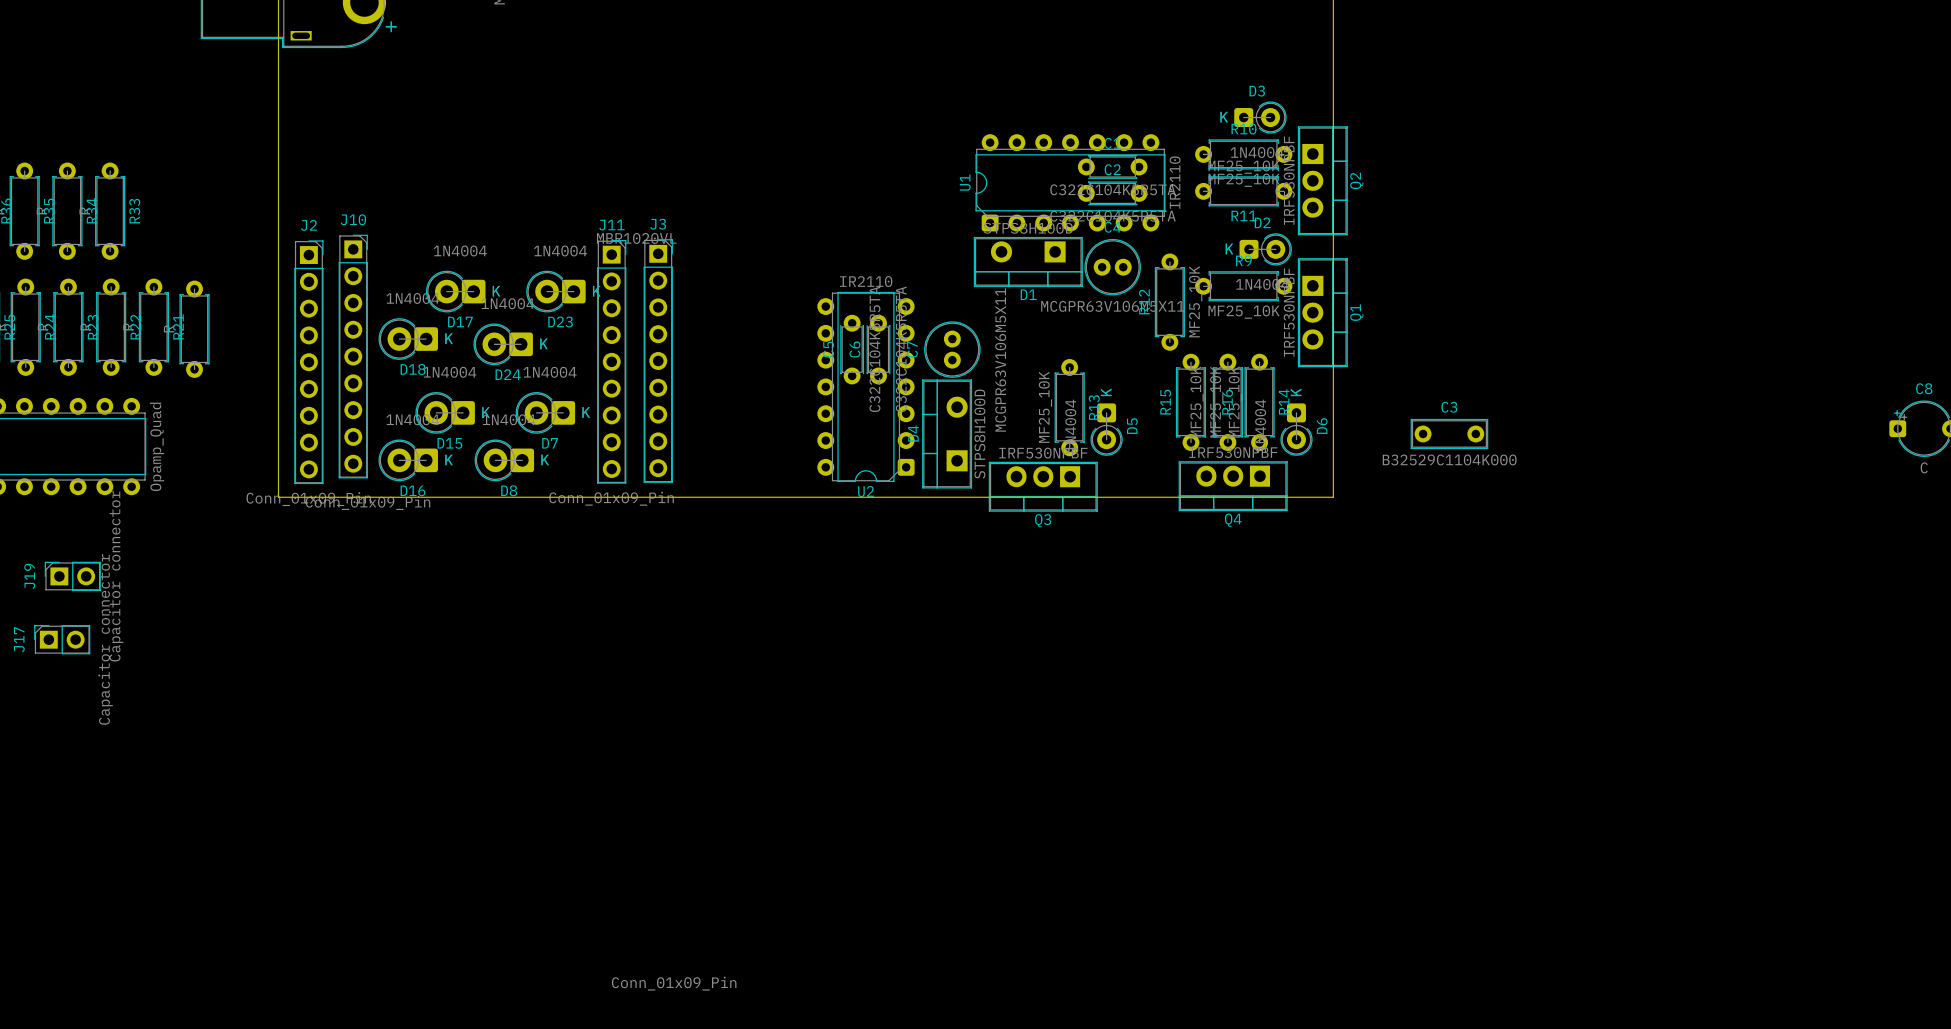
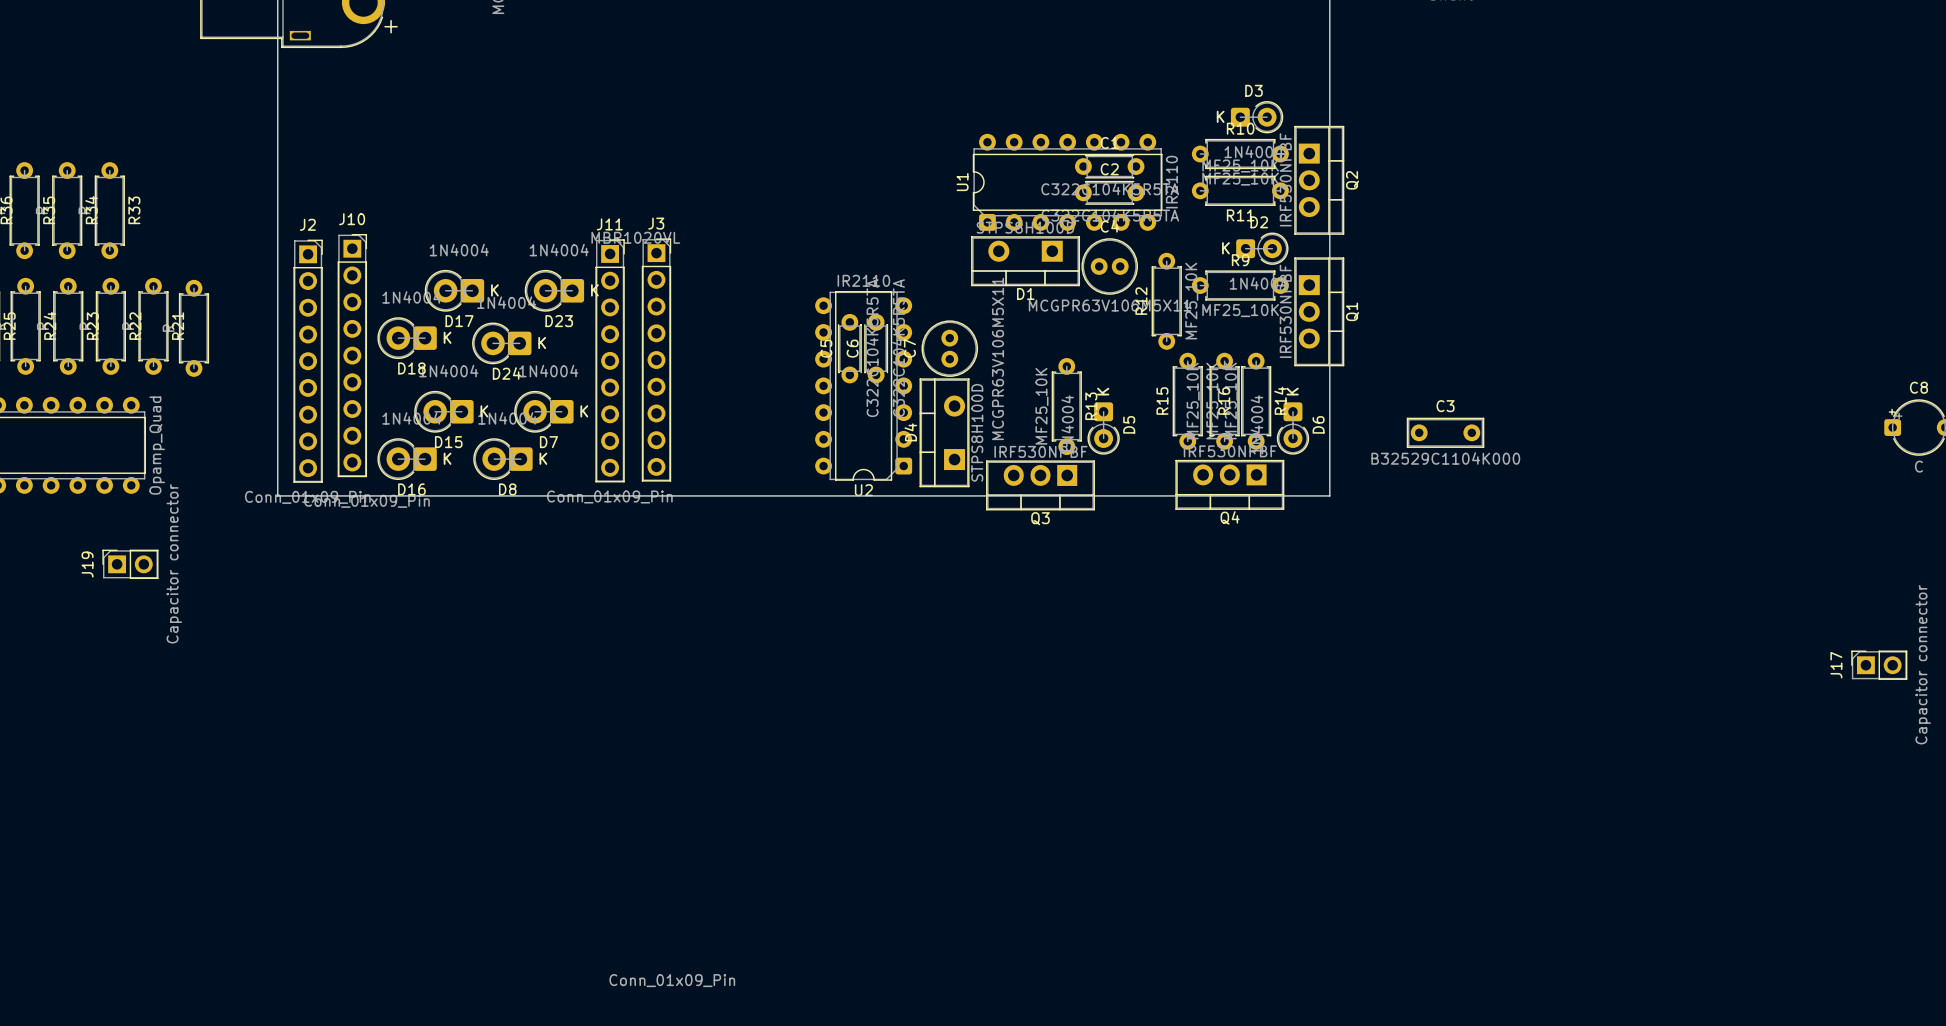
J19 position: (72, 576) -> (130, 564)
J17 position: (62, 639) -> (1879, 665)

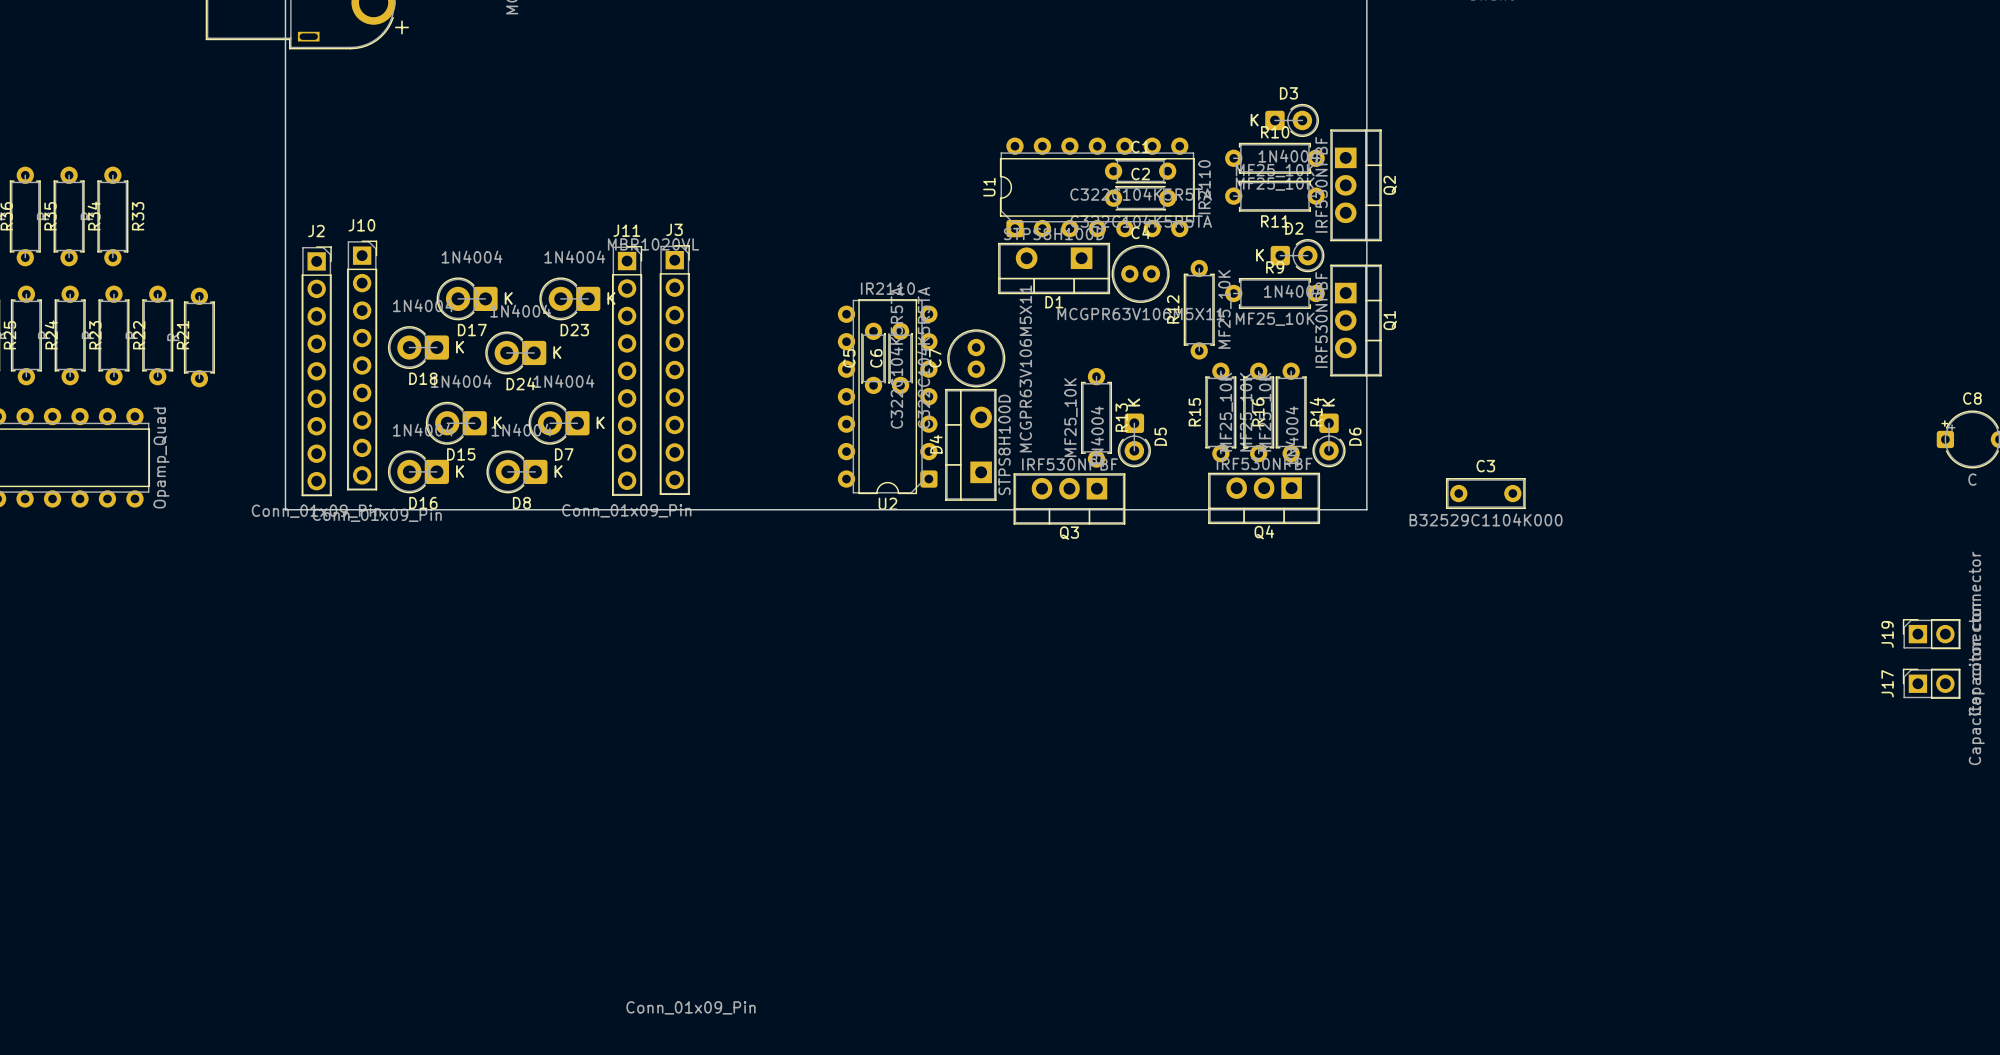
C3 position: (1445, 432) -> (1485, 493)
J19 position: (130, 564) -> (1931, 634)

